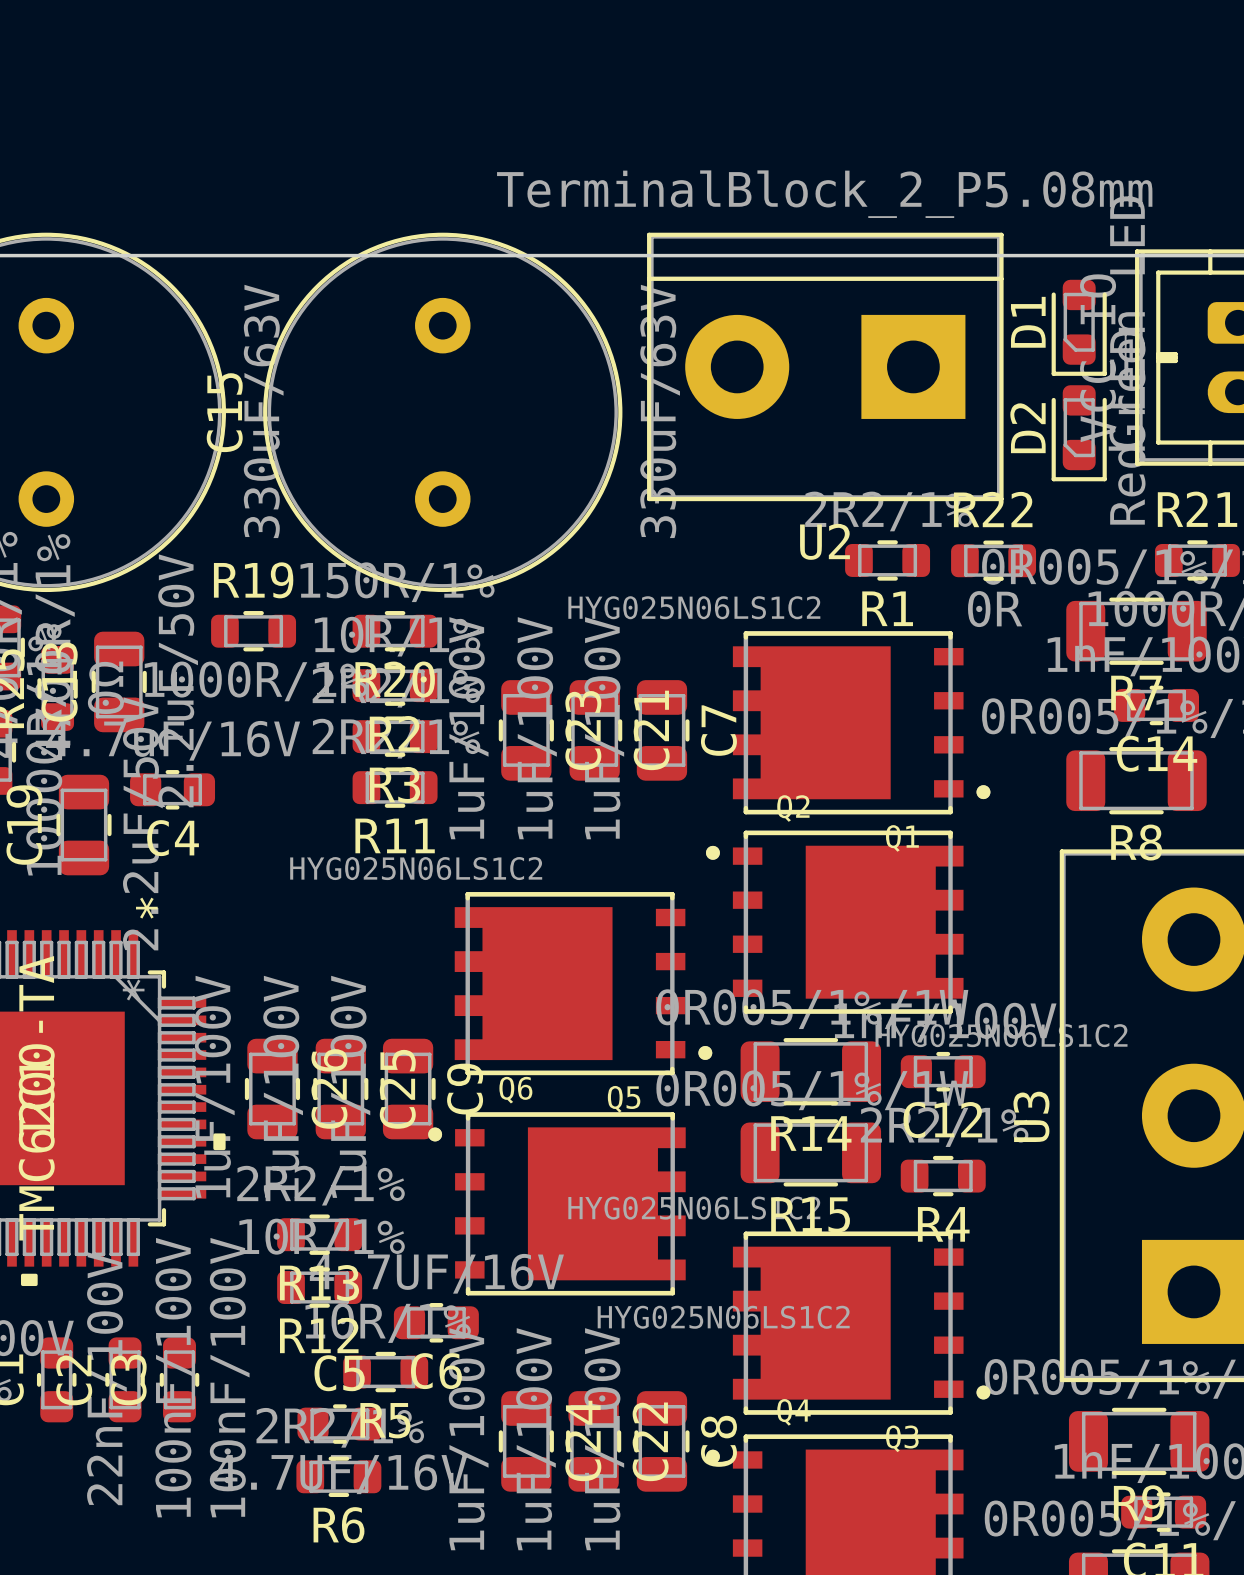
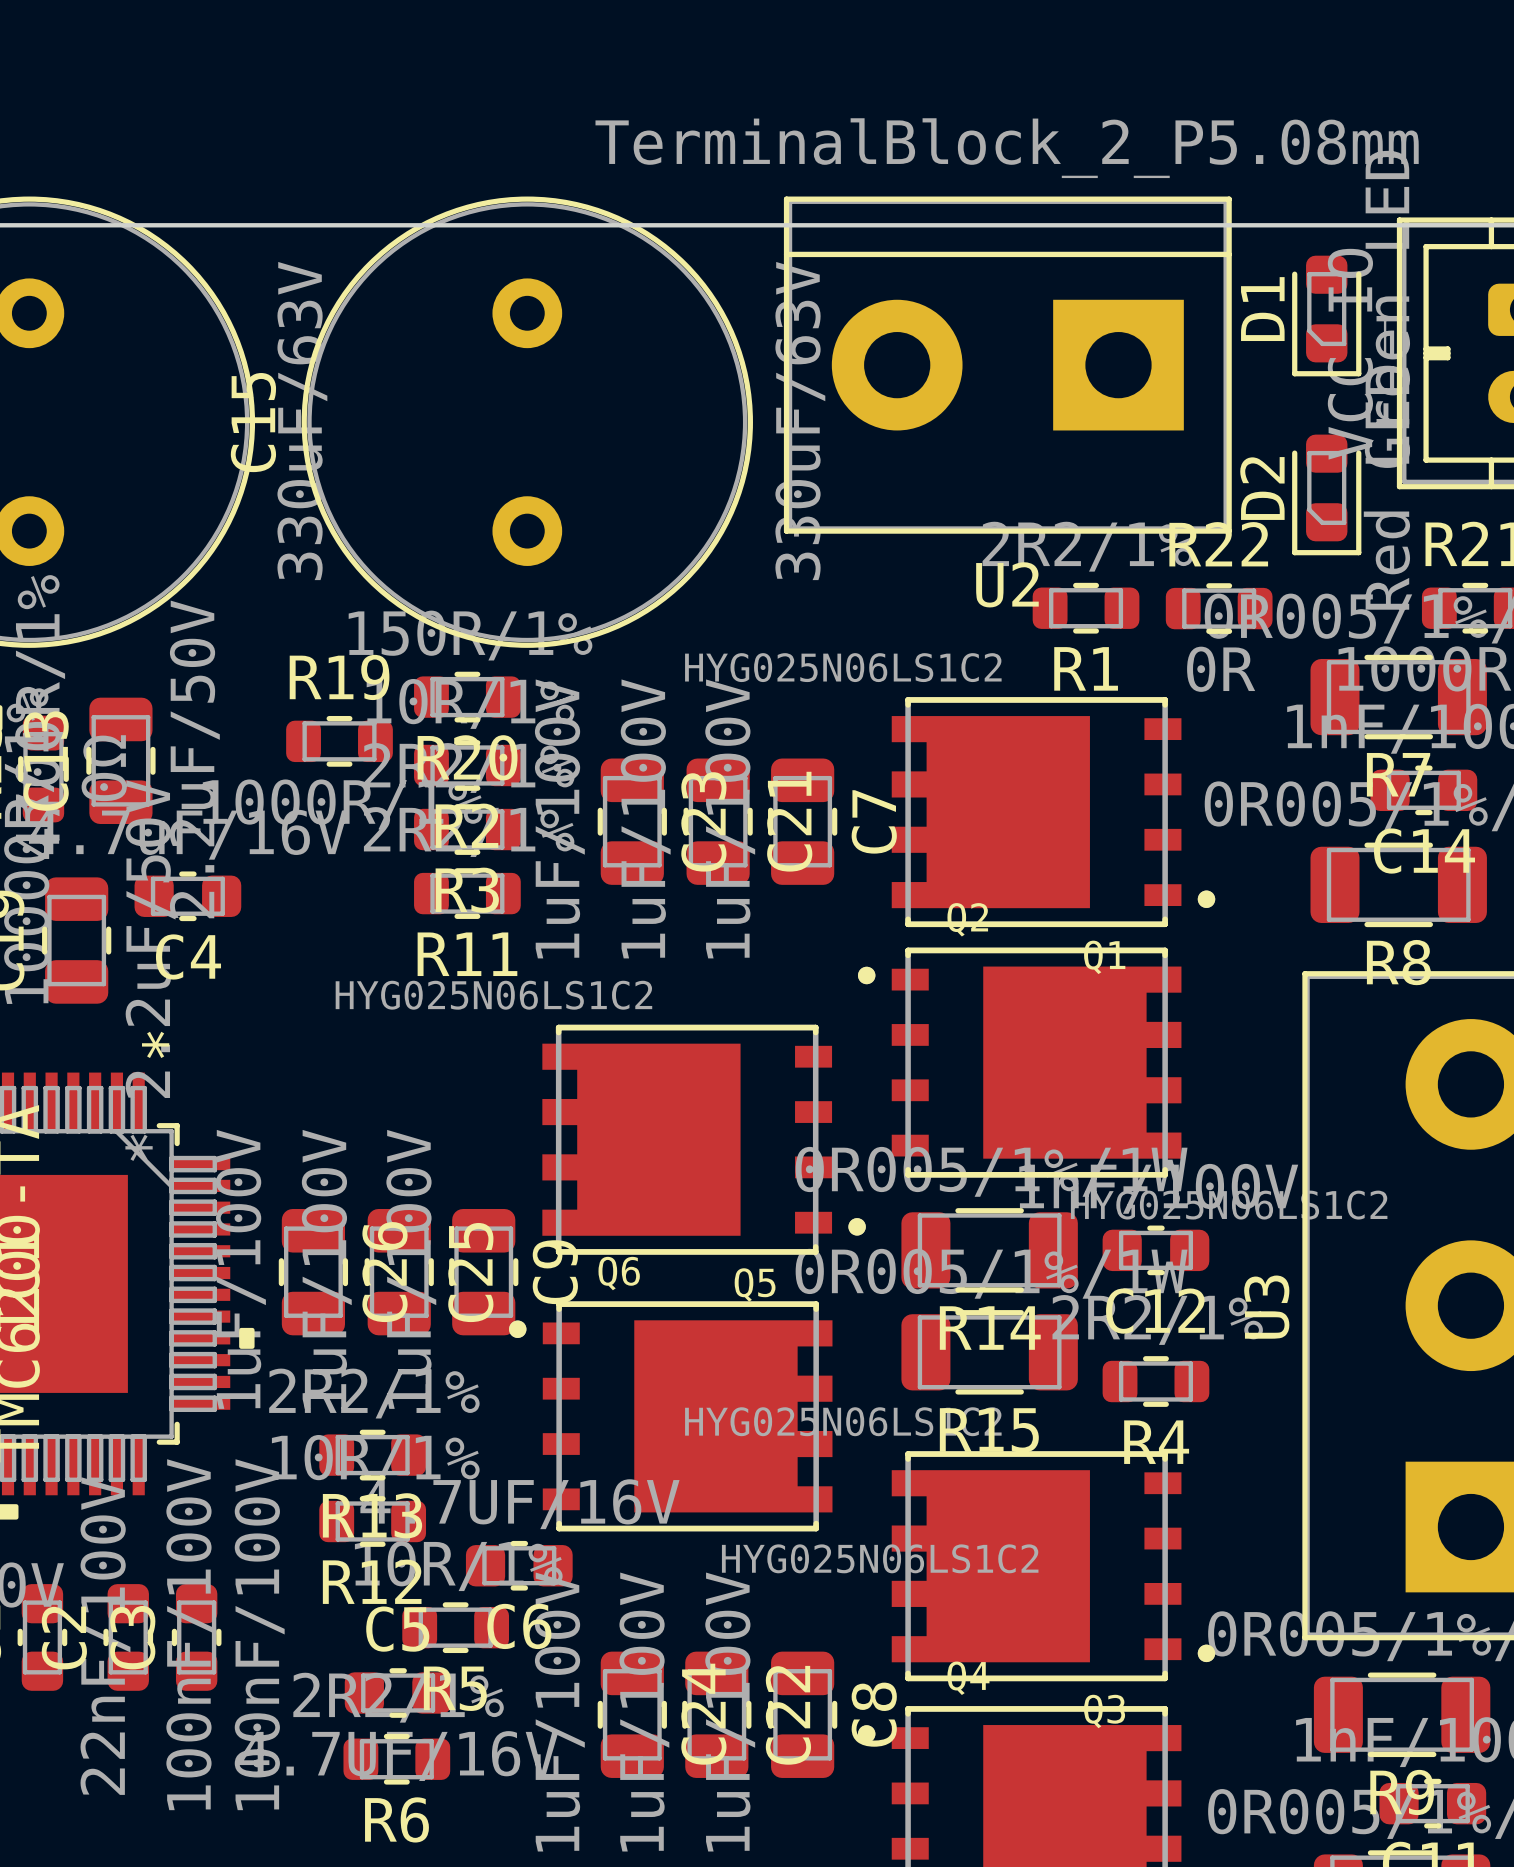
D2 position: (1079, 433) -> (1326, 494)
R19 position: (253, 631) -> (339, 741)

